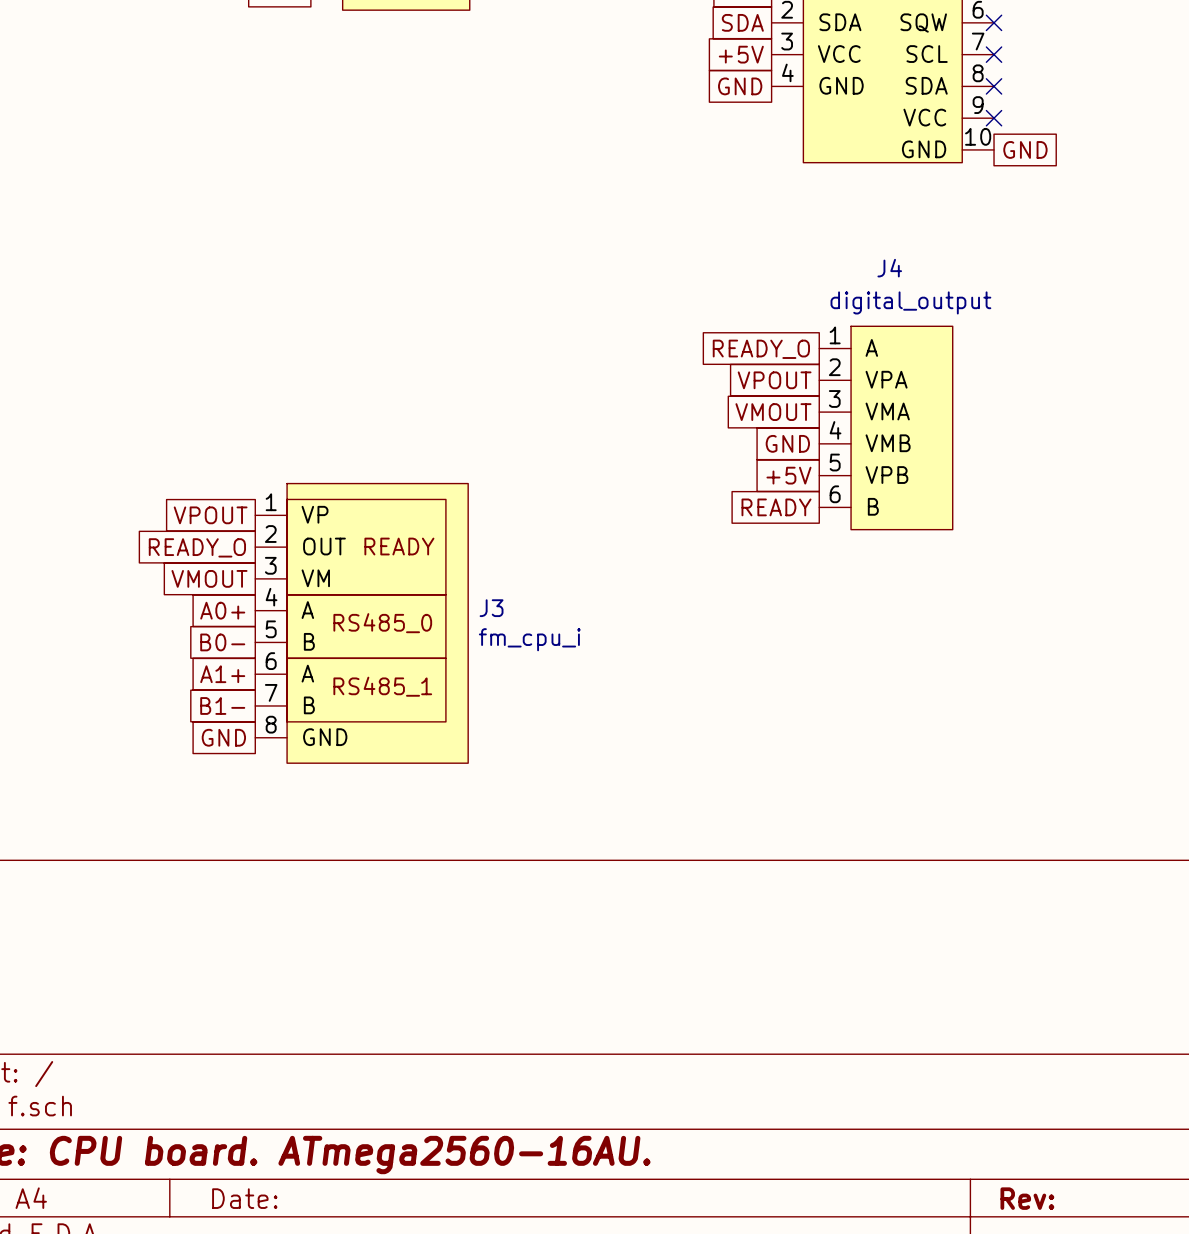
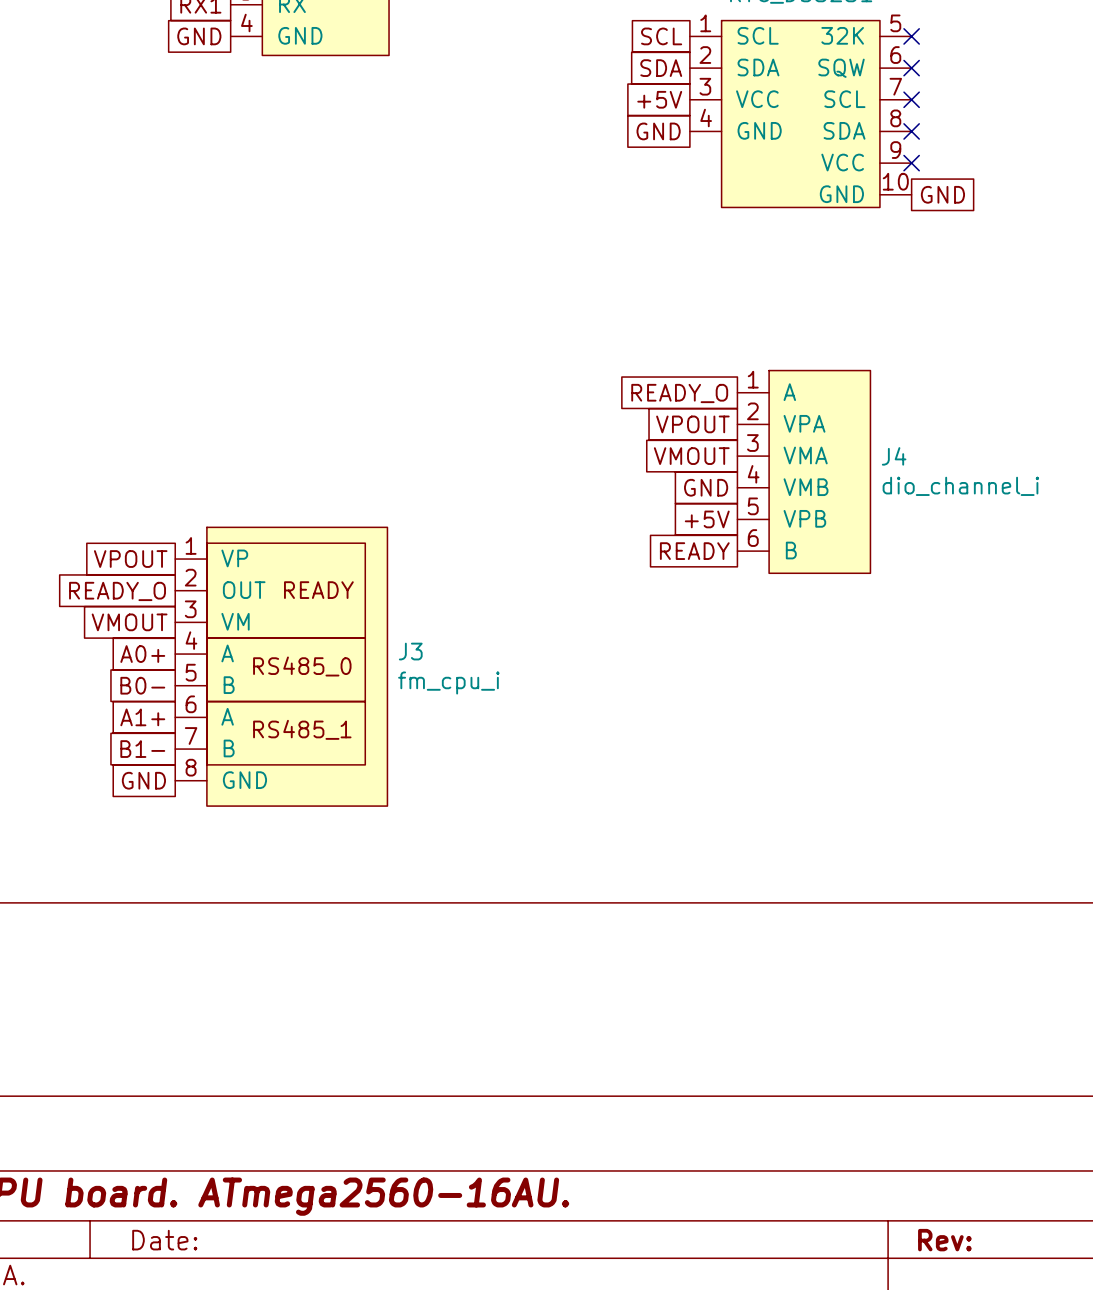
J4 name position: J4 (889, 268) -> J4 (894, 456)
J4 value: digital_output (910, 302) -> dio_channel_i (960, 486)

